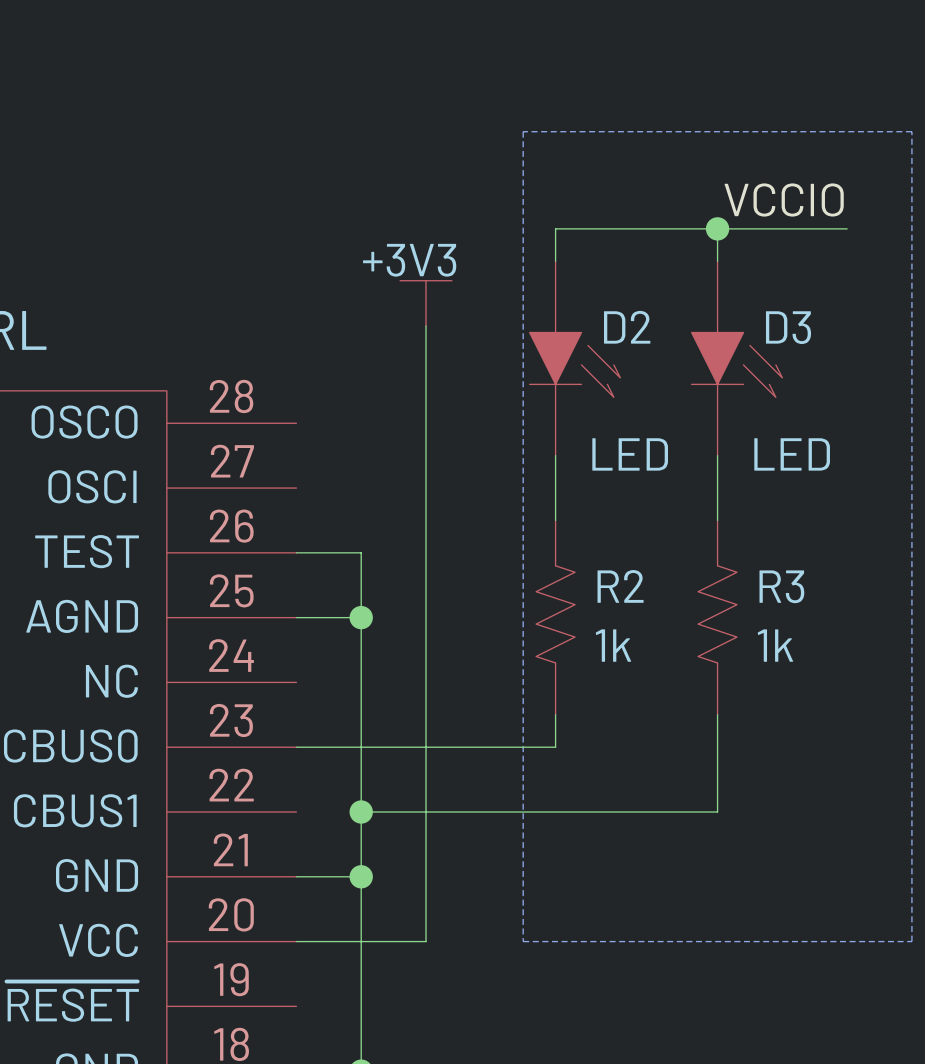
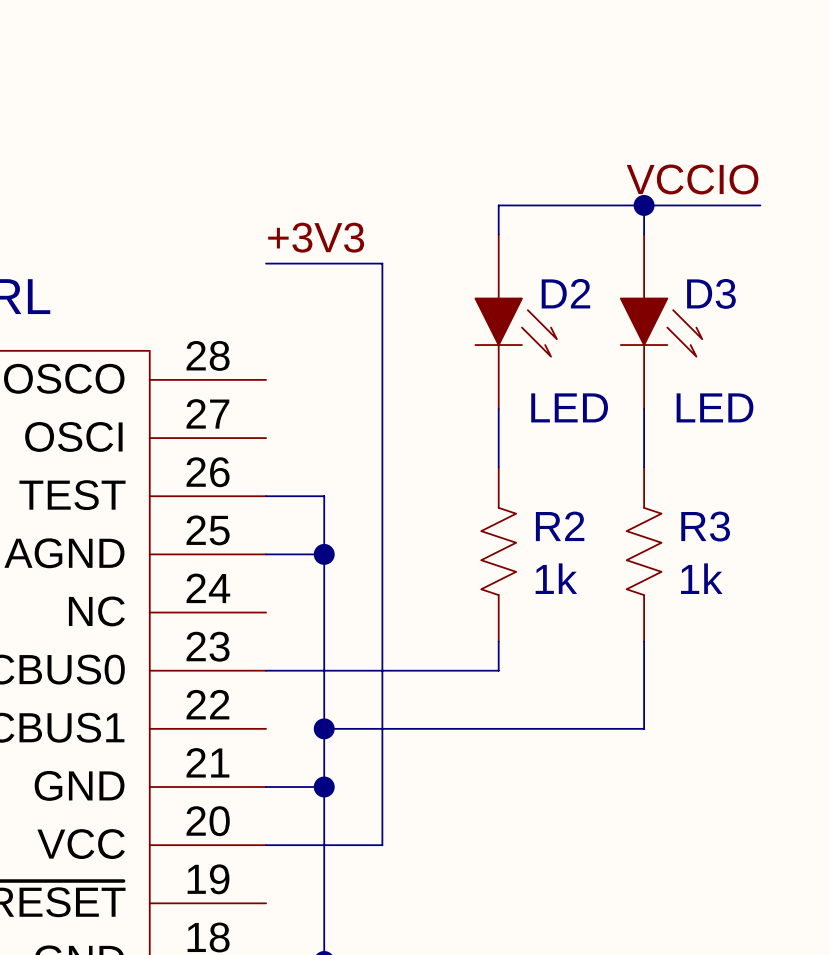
line: (523, 131) (523, 941) (911, 941) (911, 131) (523, 131) -> none
label: none -> +3V3 (316, 237)
wire: none -> (266, 263) (382, 263) (382, 292)
power symbol: +3V3 (426, 303) -> none

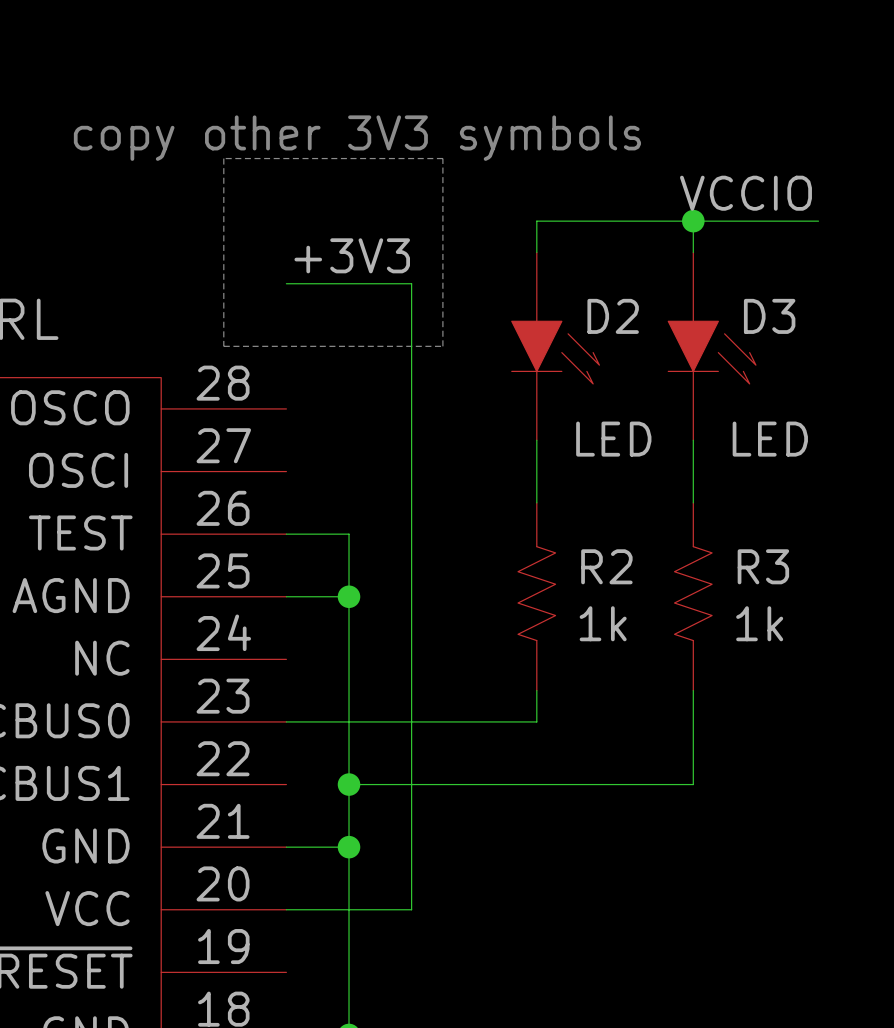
text: none -> copy other 3V3 symbols (357, 138)
line: none -> (223, 158) (223, 346) (442, 346) (442, 158) (223, 158)

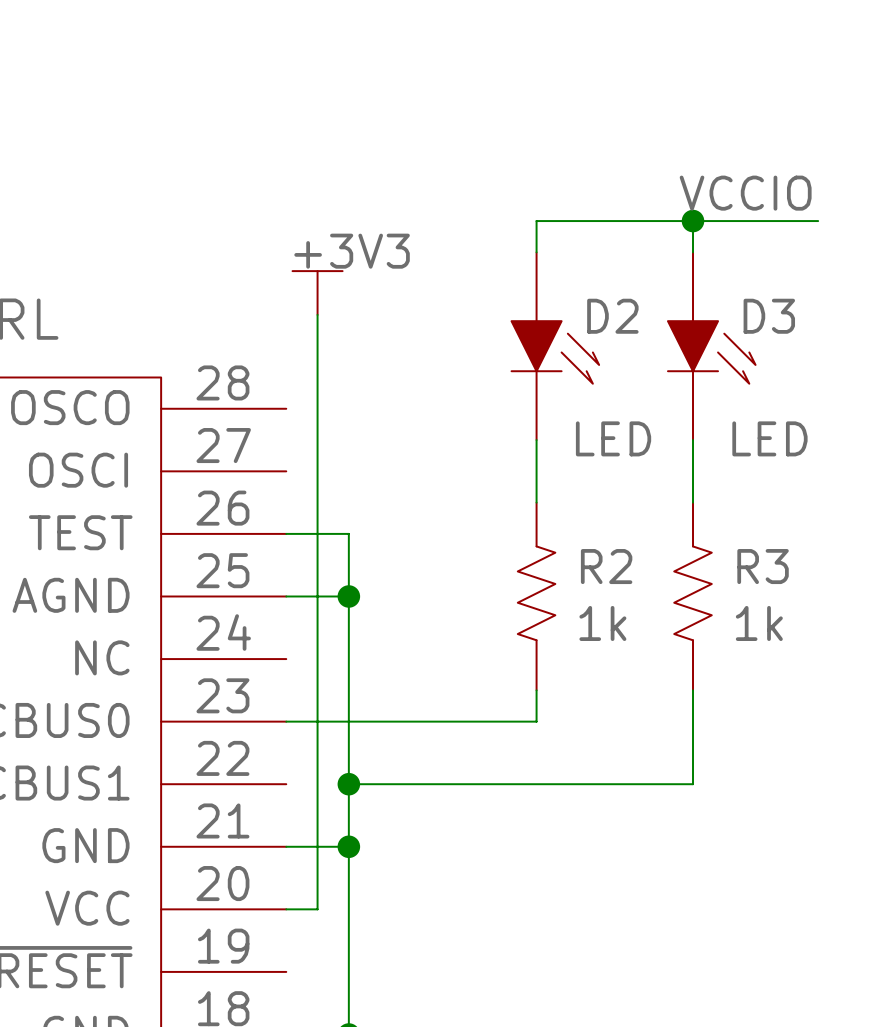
text: copy other 3V3 symbols (357, 138) -> none
line: (223, 158) (223, 346) (442, 346) (442, 158) (223, 158) -> none
label: +3V3 (352, 255) -> none
wire: (286, 283) (411, 283) (411, 909) (317, 909) -> (317, 314) (317, 909)
power symbol: none -> +3V3 (317, 293)

